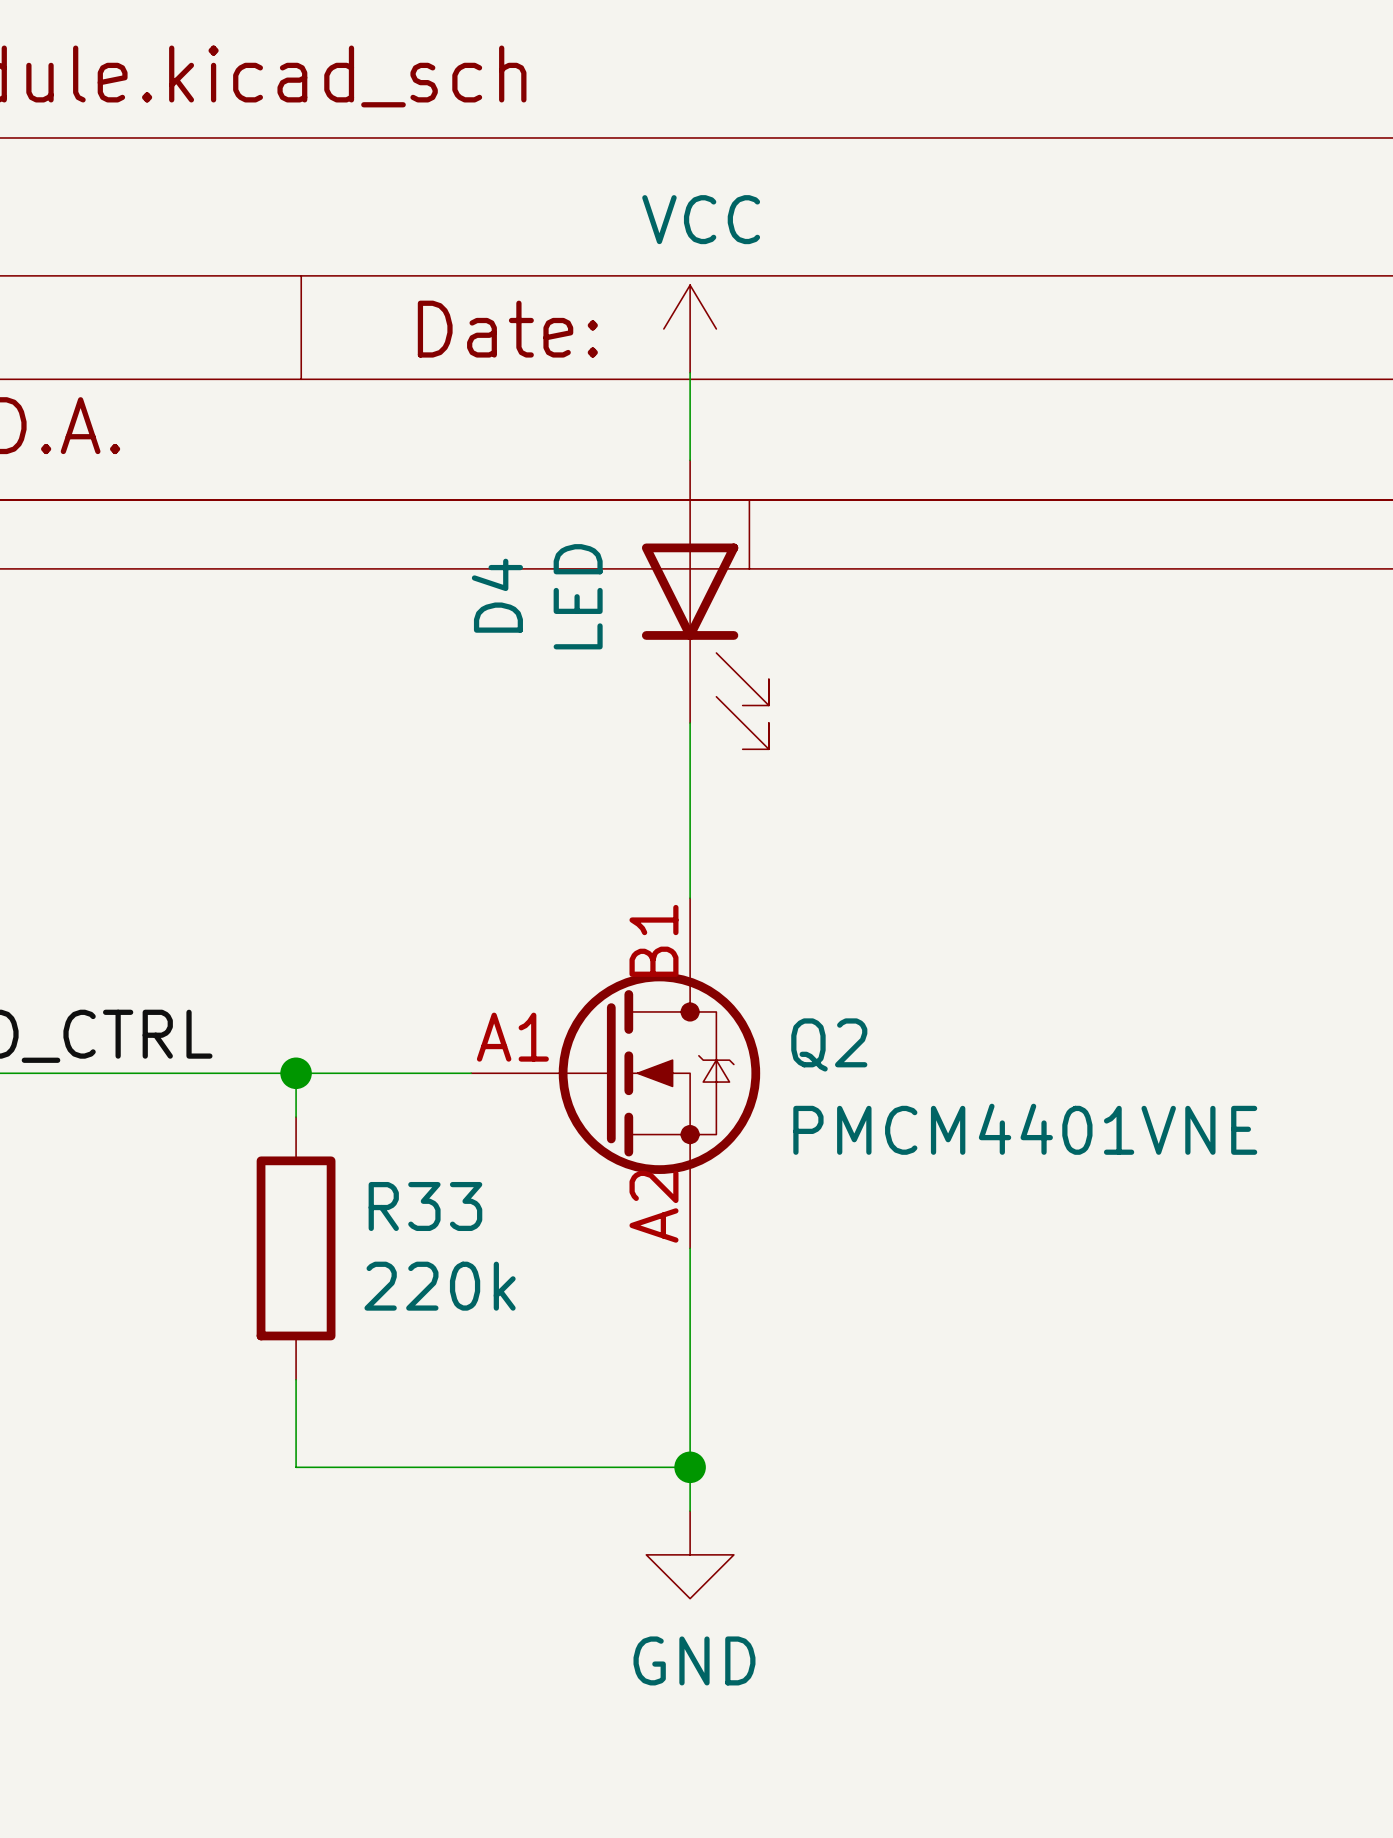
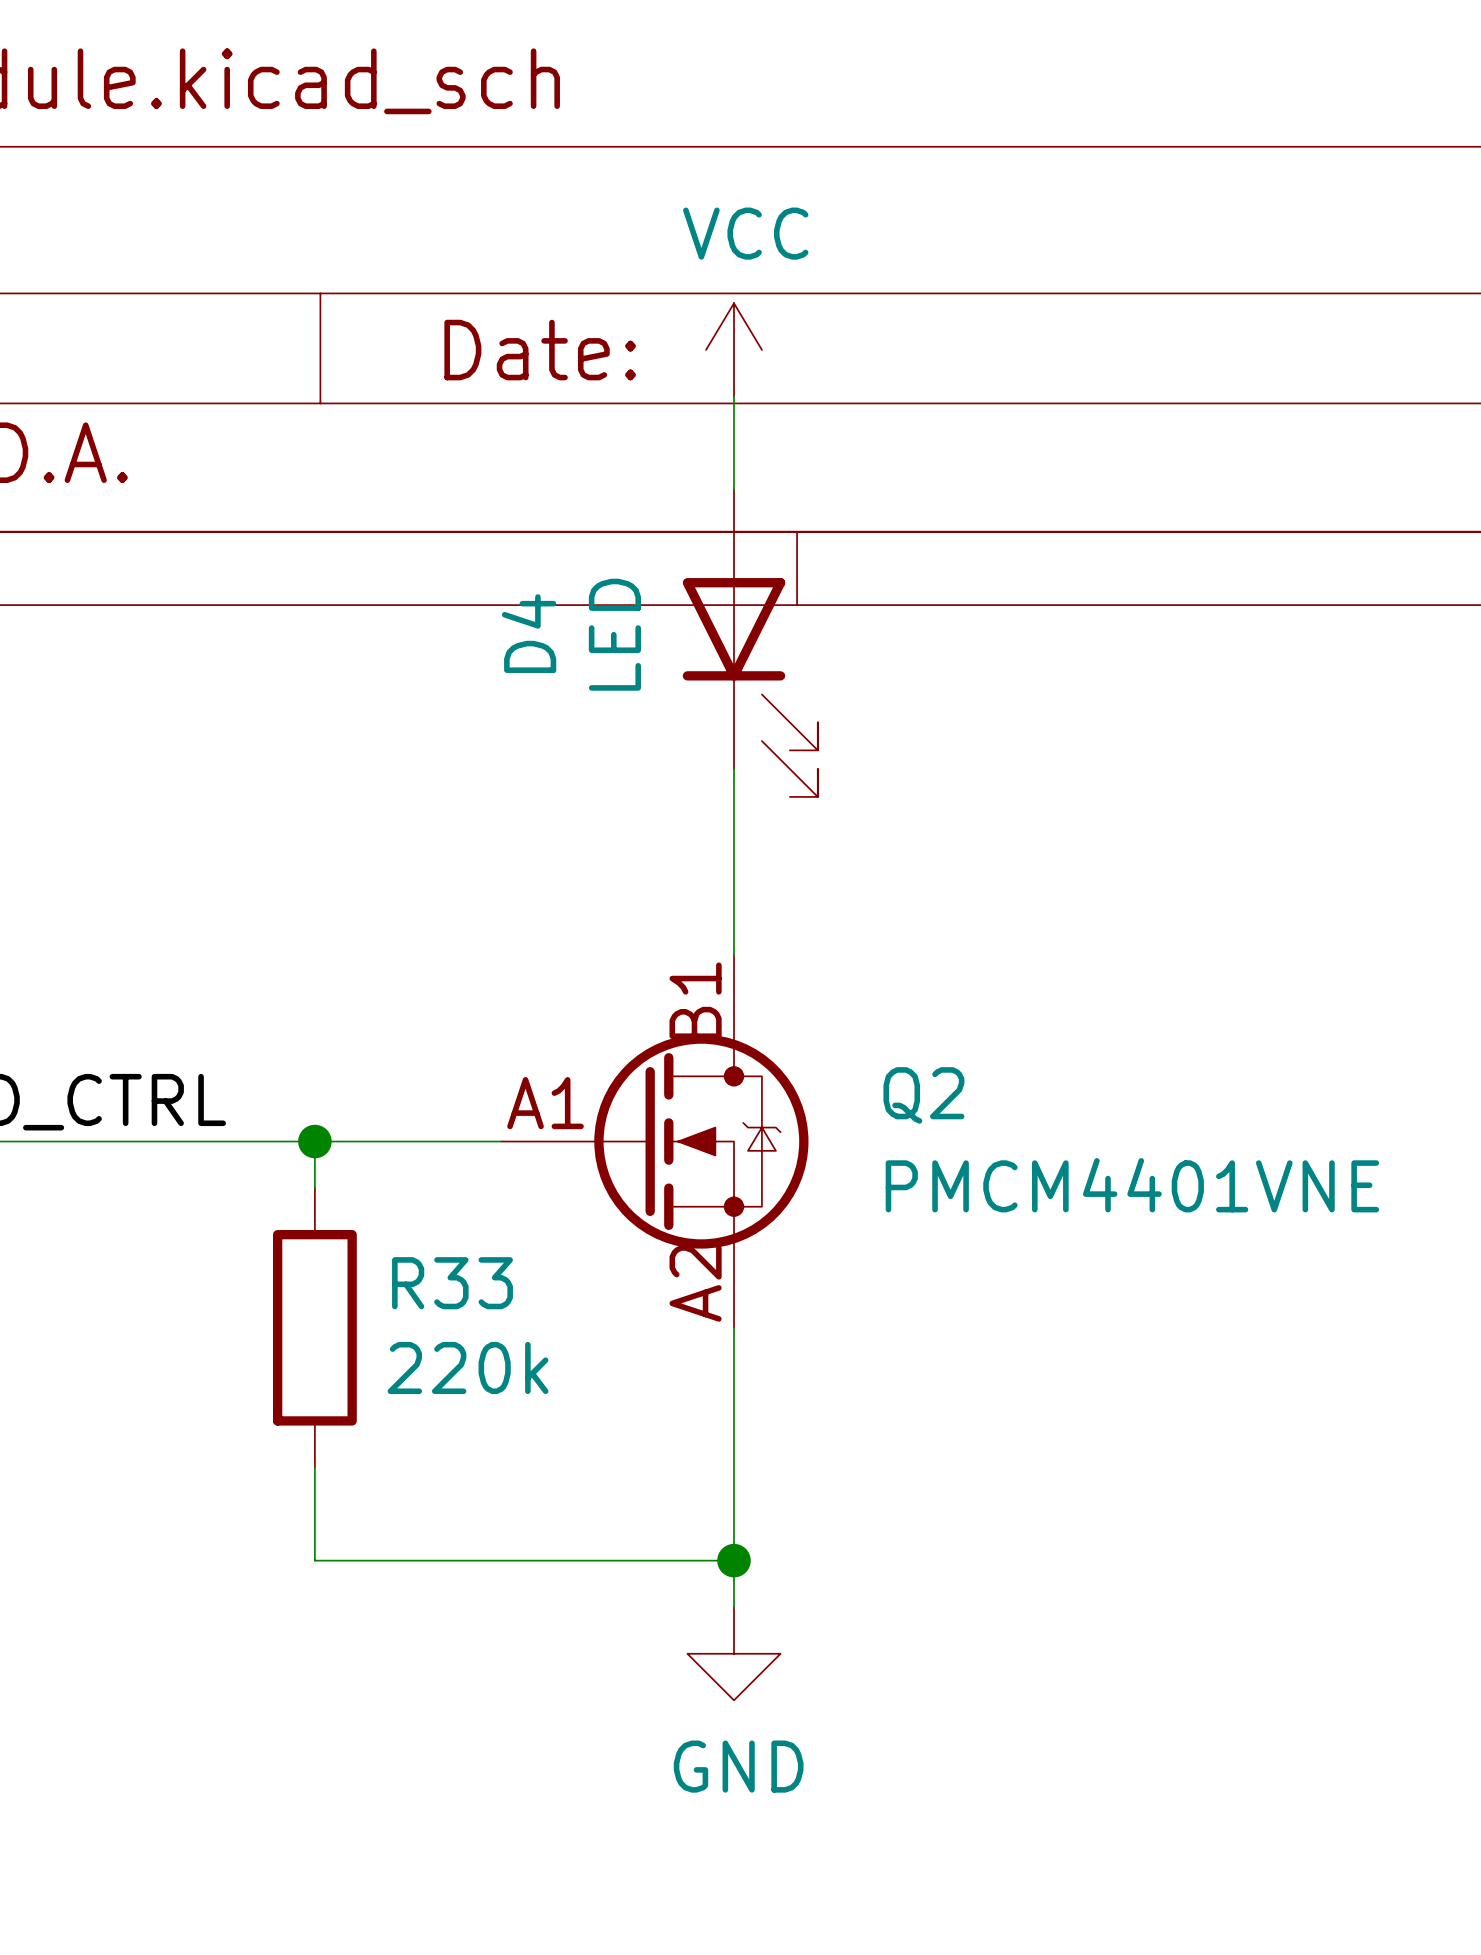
Q2 name position: Q2 (829, 1044) -> Q2 (923, 1095)
Q2 value position: PMCM4401VNE (1025, 1129) -> PMCM4401VNE (1132, 1185)

